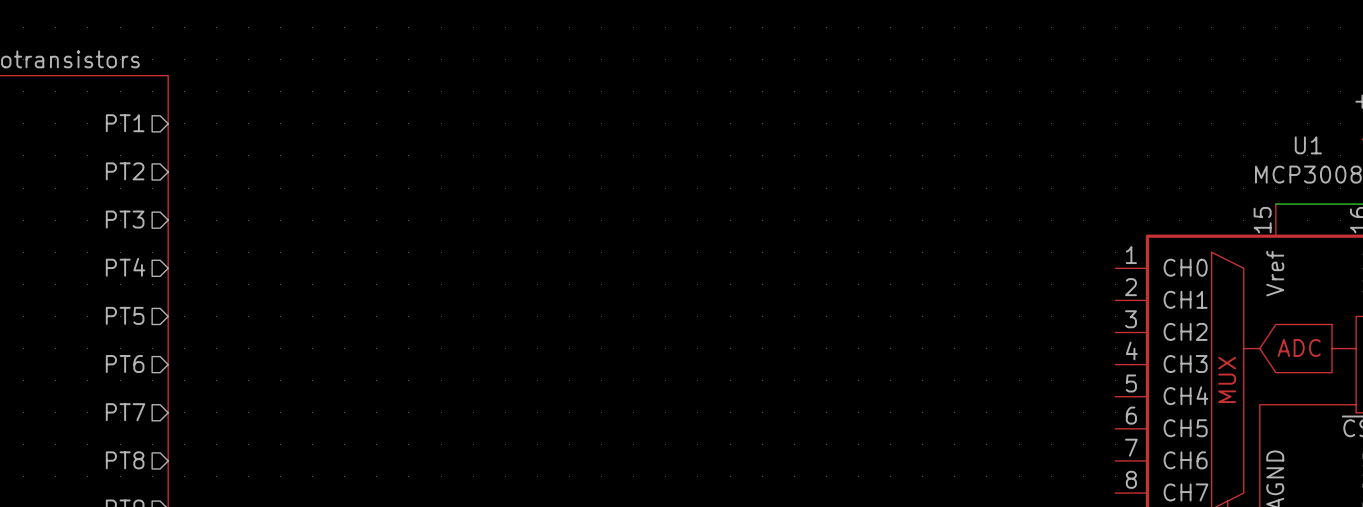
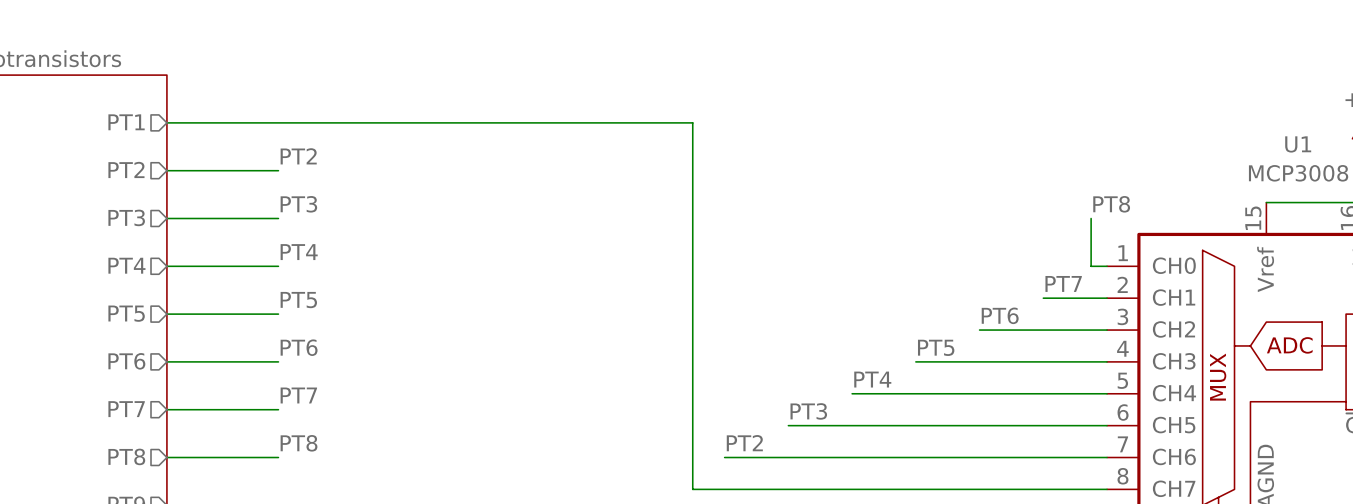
wire: none -> (166, 122) (692, 122) (692, 489) (1107, 489)
label: none -> PT2 (298, 156)
wire: none -> (166, 170) (278, 170)
label: none -> PT3 (298, 204)
label: none -> PT8 (1111, 204)
wire: none -> (166, 218) (278, 218)
wire: none -> (1091, 218) (1091, 266) (1107, 266)
label: none -> PT4 (299, 252)
wire: none -> (166, 266) (278, 266)
label: none -> PT7 (1063, 283)
wire: none -> (1043, 298) (1107, 298)
label: none -> PT5 (298, 300)
wire: none -> (166, 314) (278, 314)
label: none -> PT6 (1000, 315)
wire: none -> (979, 330) (1107, 330)
label: none -> PT6 (299, 347)
label: none -> PT5 (936, 347)
wire: none -> (166, 361) (278, 361)
wire: none -> (915, 361) (1107, 361)
label: none -> PT4 (872, 379)
wire: none -> (852, 393) (1107, 393)
label: none -> PT7 (298, 395)
wire: none -> (166, 409) (278, 409)
label: none -> PT3 (808, 411)
wire: none -> (788, 425) (1107, 425)
label: none -> PT8 (299, 443)
label: none -> PT2 (744, 443)
wire: none -> (166, 457) (278, 457)
wire: none -> (724, 457) (1107, 457)

